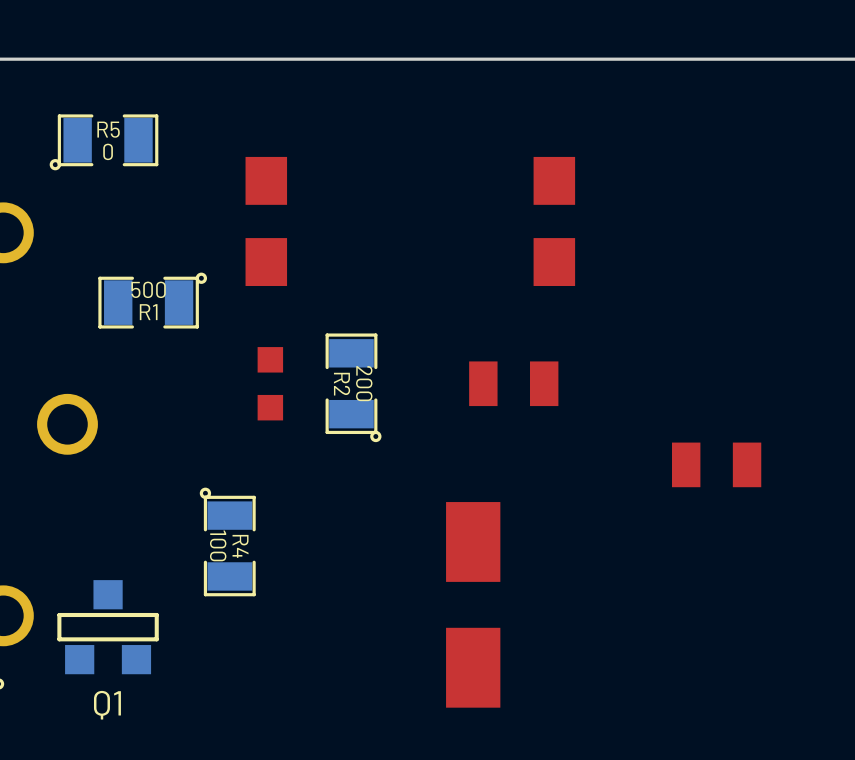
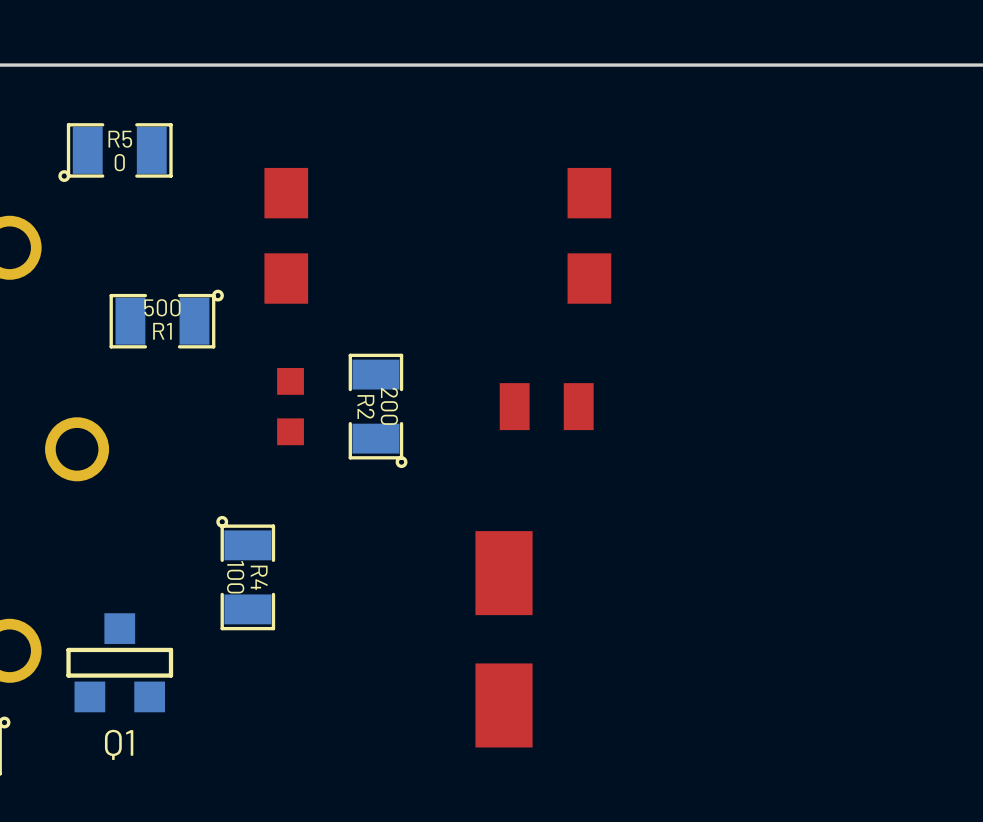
part: (716, 464) -> none

